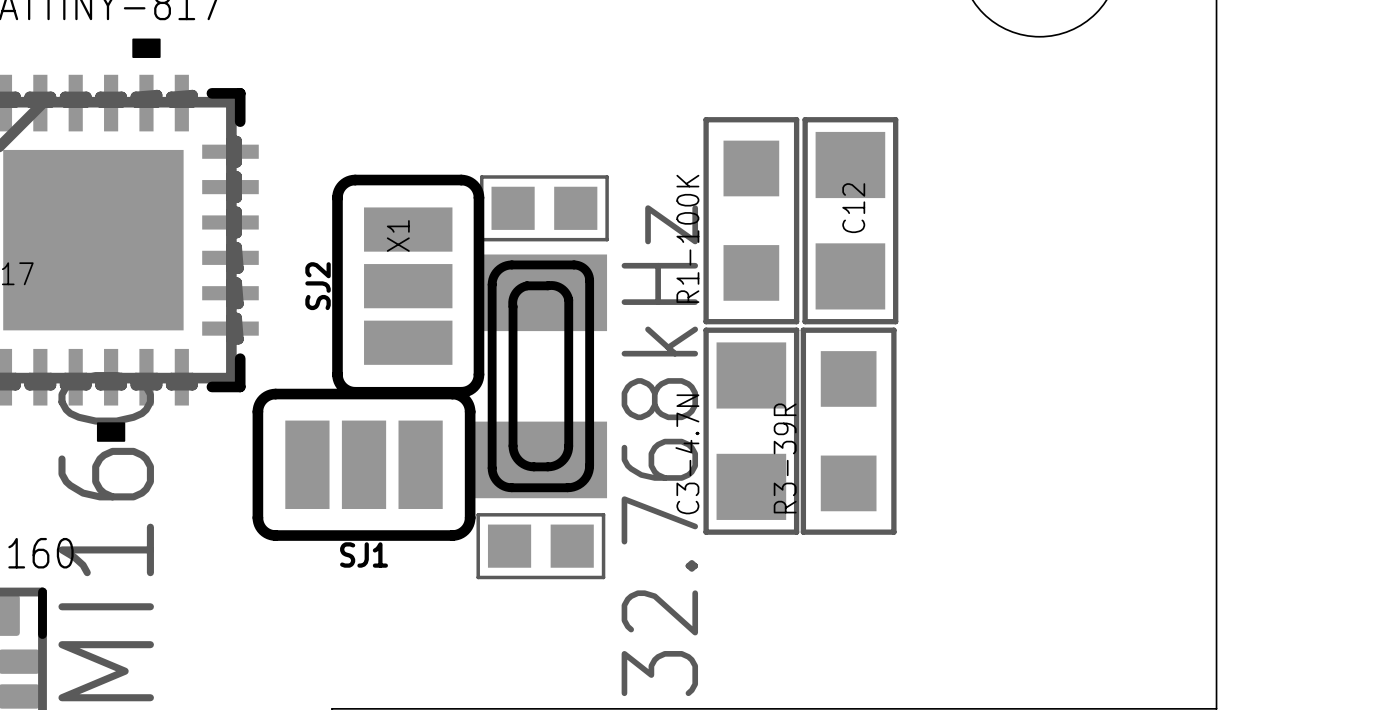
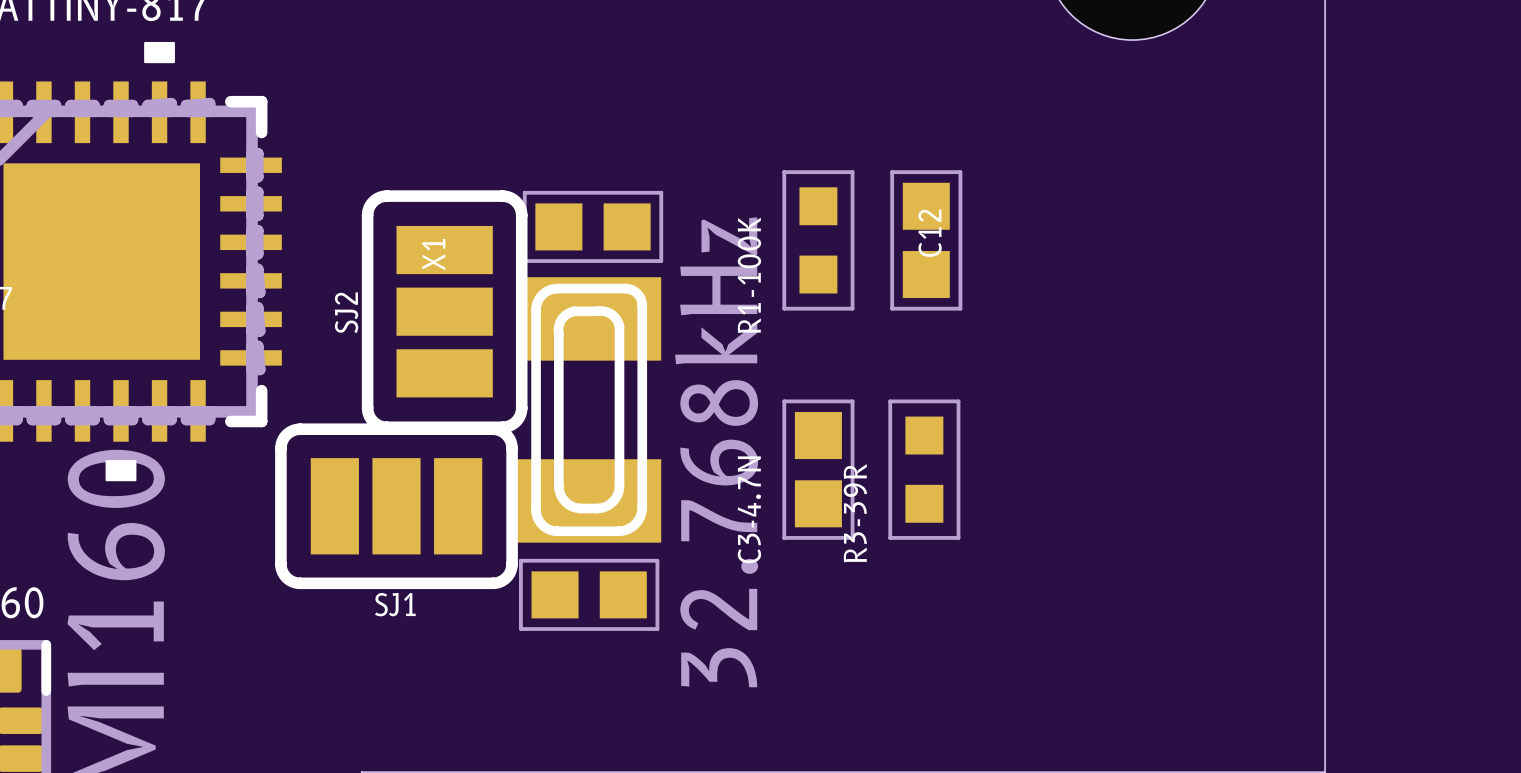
R1-100K footprint: [703, 117, 800, 325] -> [782, 170, 855, 311]
C12 footprint: [802, 117, 899, 325] -> [890, 170, 963, 311]
C3-4.7N footprint: [703, 327, 800, 535] -> [782, 399, 855, 540]
R3-39R footprint: [800, 327, 897, 535] -> [888, 399, 961, 540]

